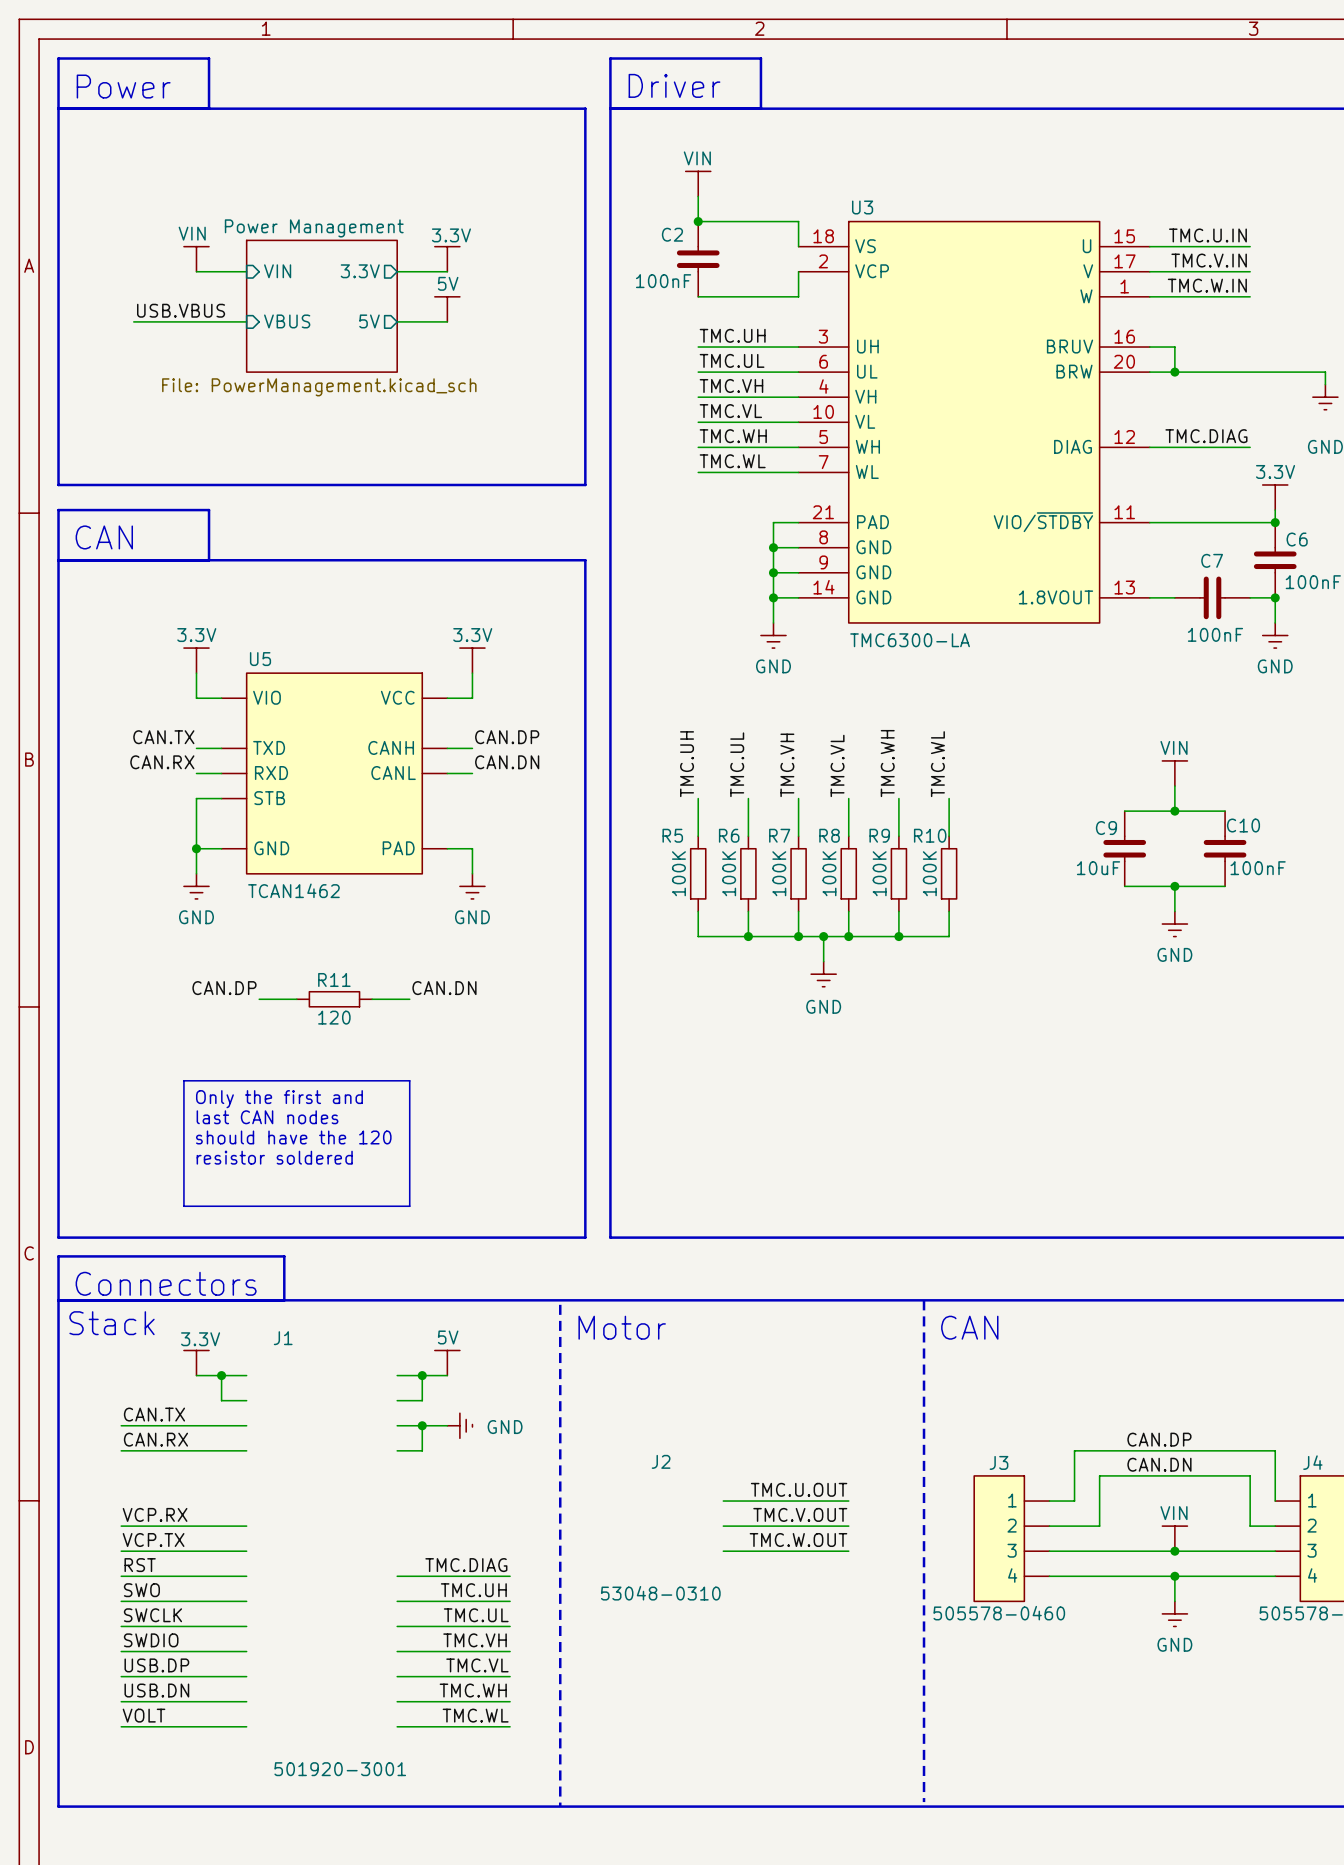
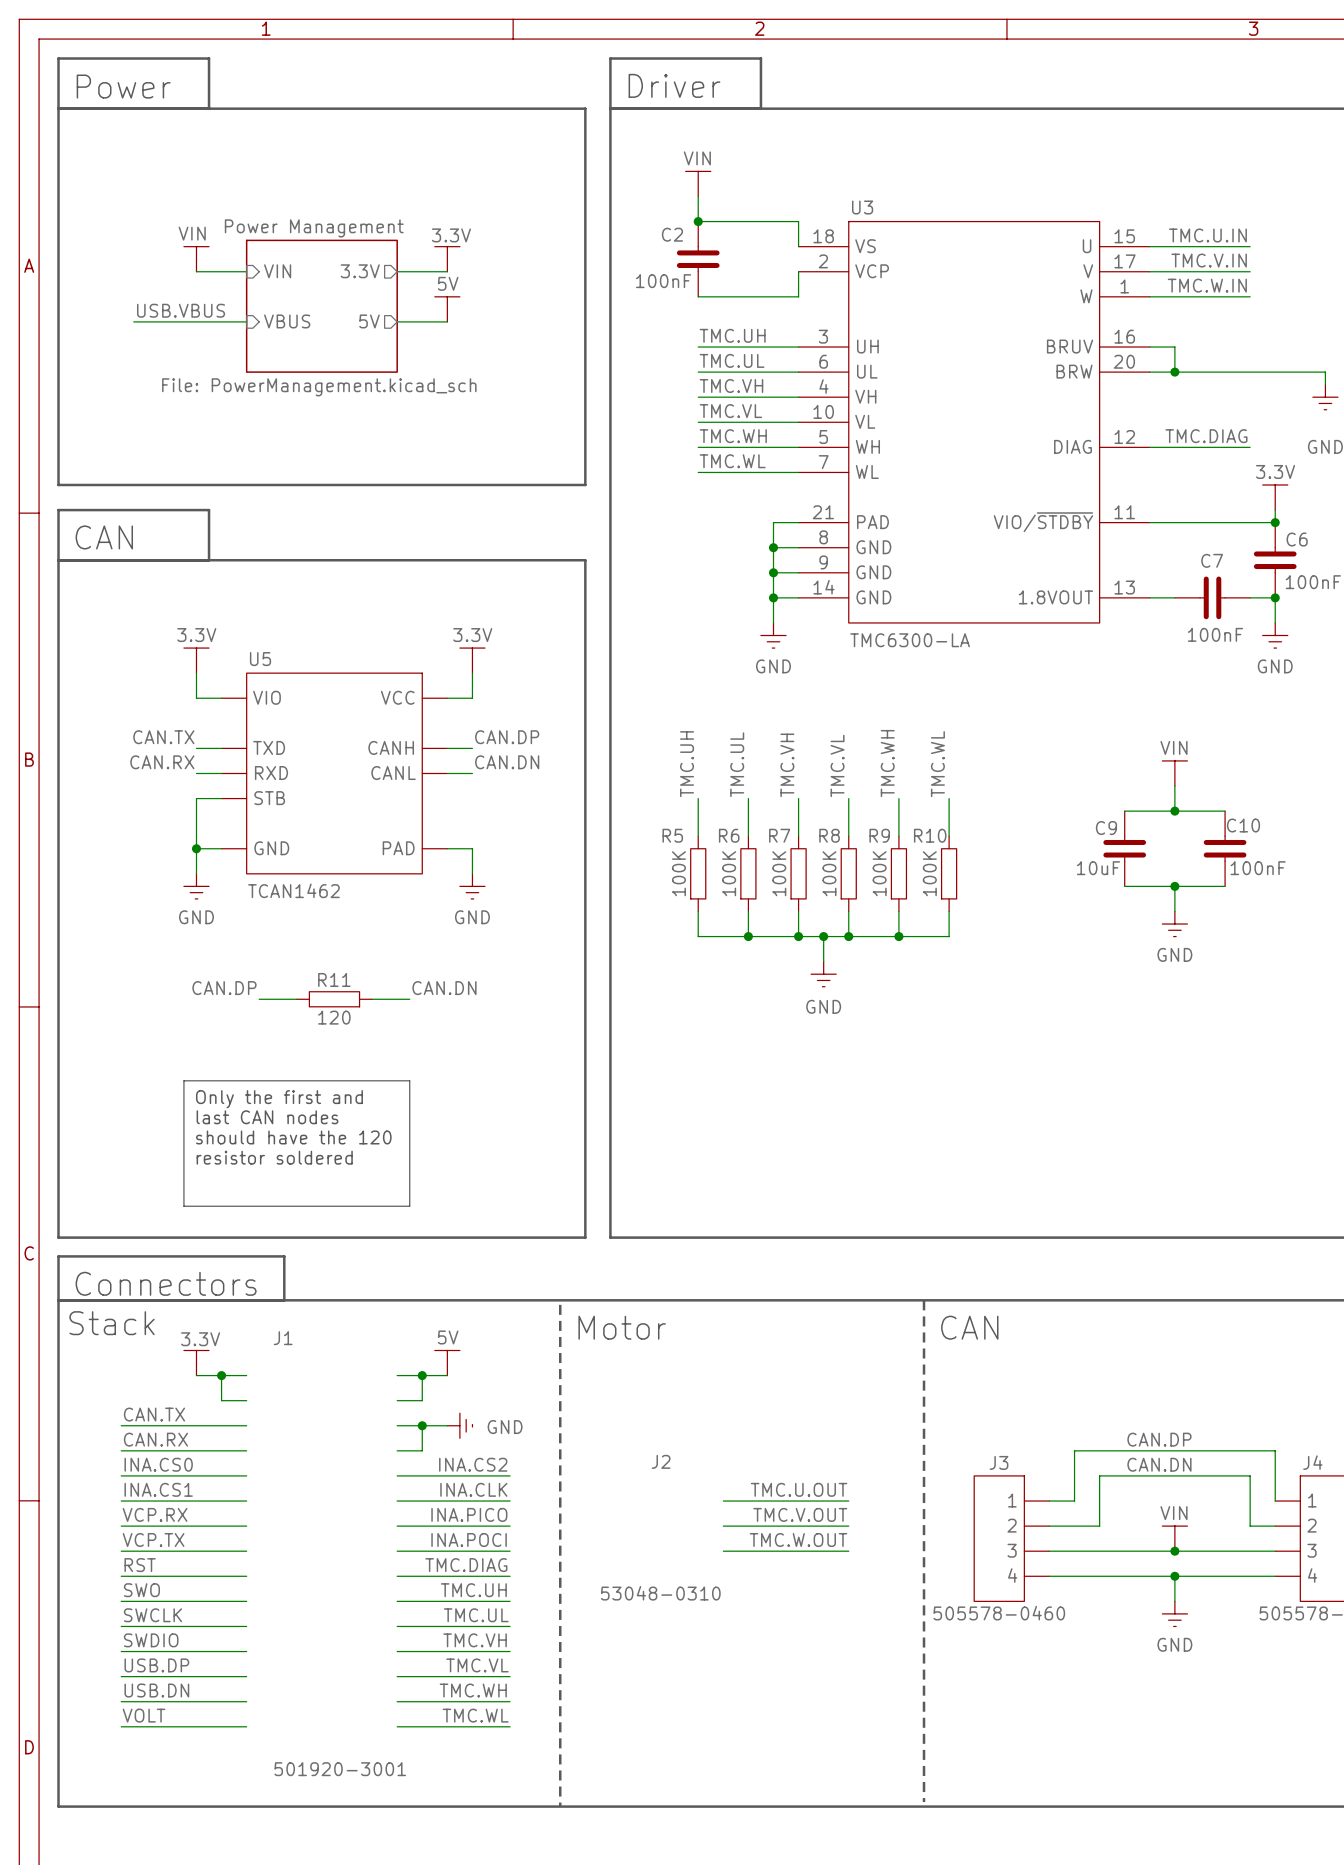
label: none -> INA.CS0 (158, 1464)
label: none -> INA.CS2 (473, 1464)
wire: none -> (121, 1475) (246, 1475)
wire: none -> (397, 1475) (510, 1475)
label: none -> INA.CS1 (158, 1489)
label: none -> INA.CLK (473, 1489)
wire: none -> (121, 1501) (246, 1501)
wire: none -> (397, 1501) (510, 1501)
label: none -> INA.PICO (469, 1514)
wire: none -> (397, 1526) (510, 1526)
label: none -> INA.POCI (469, 1540)
wire: none -> (397, 1551) (510, 1551)

